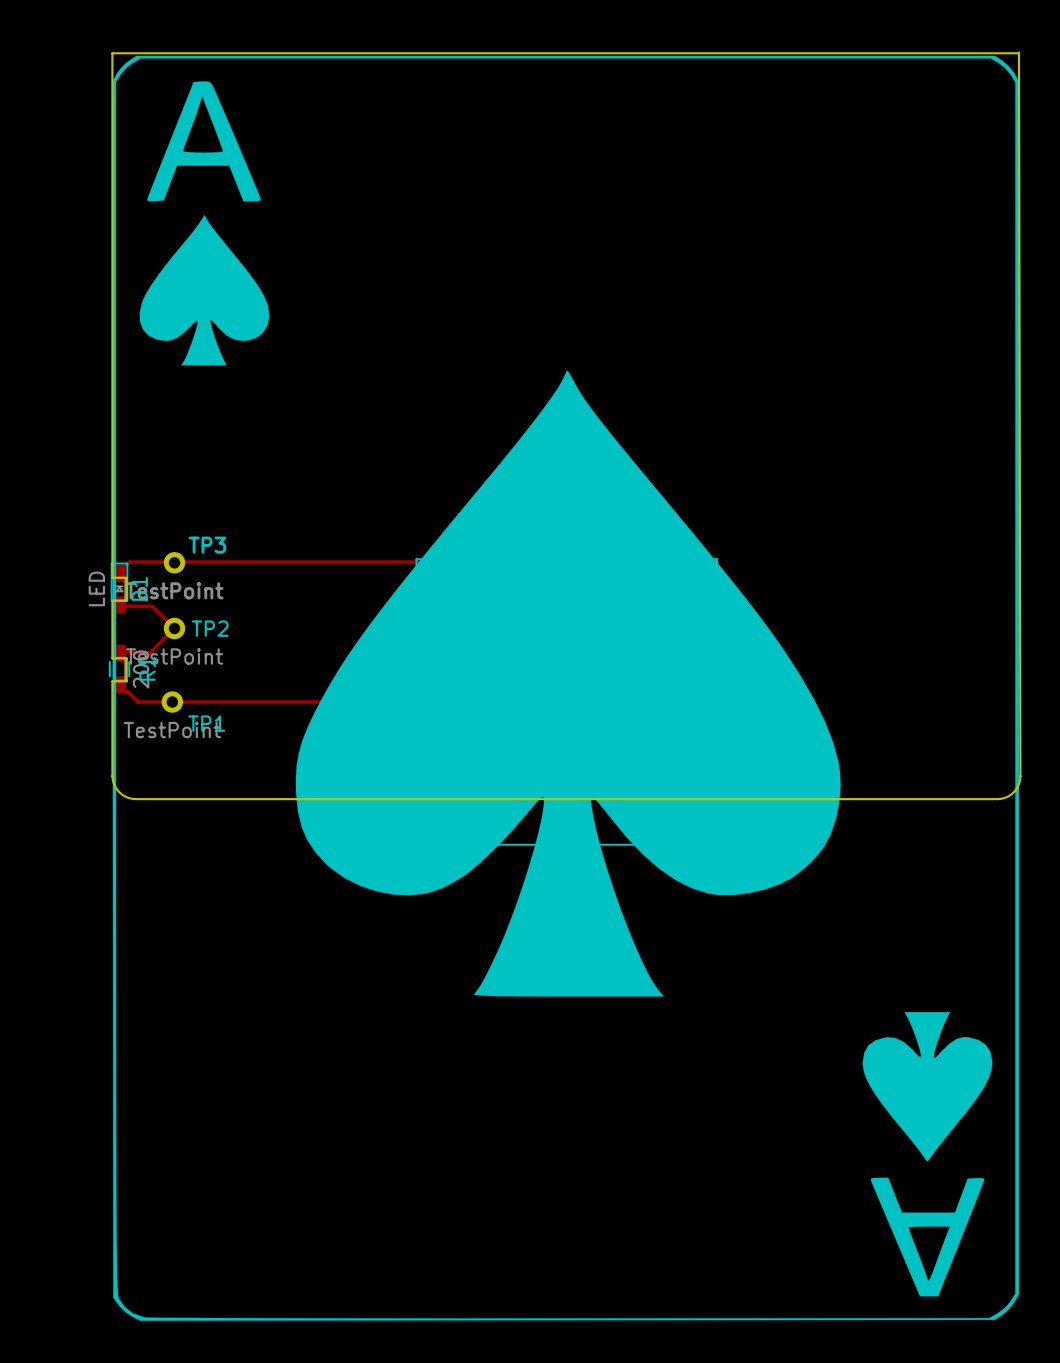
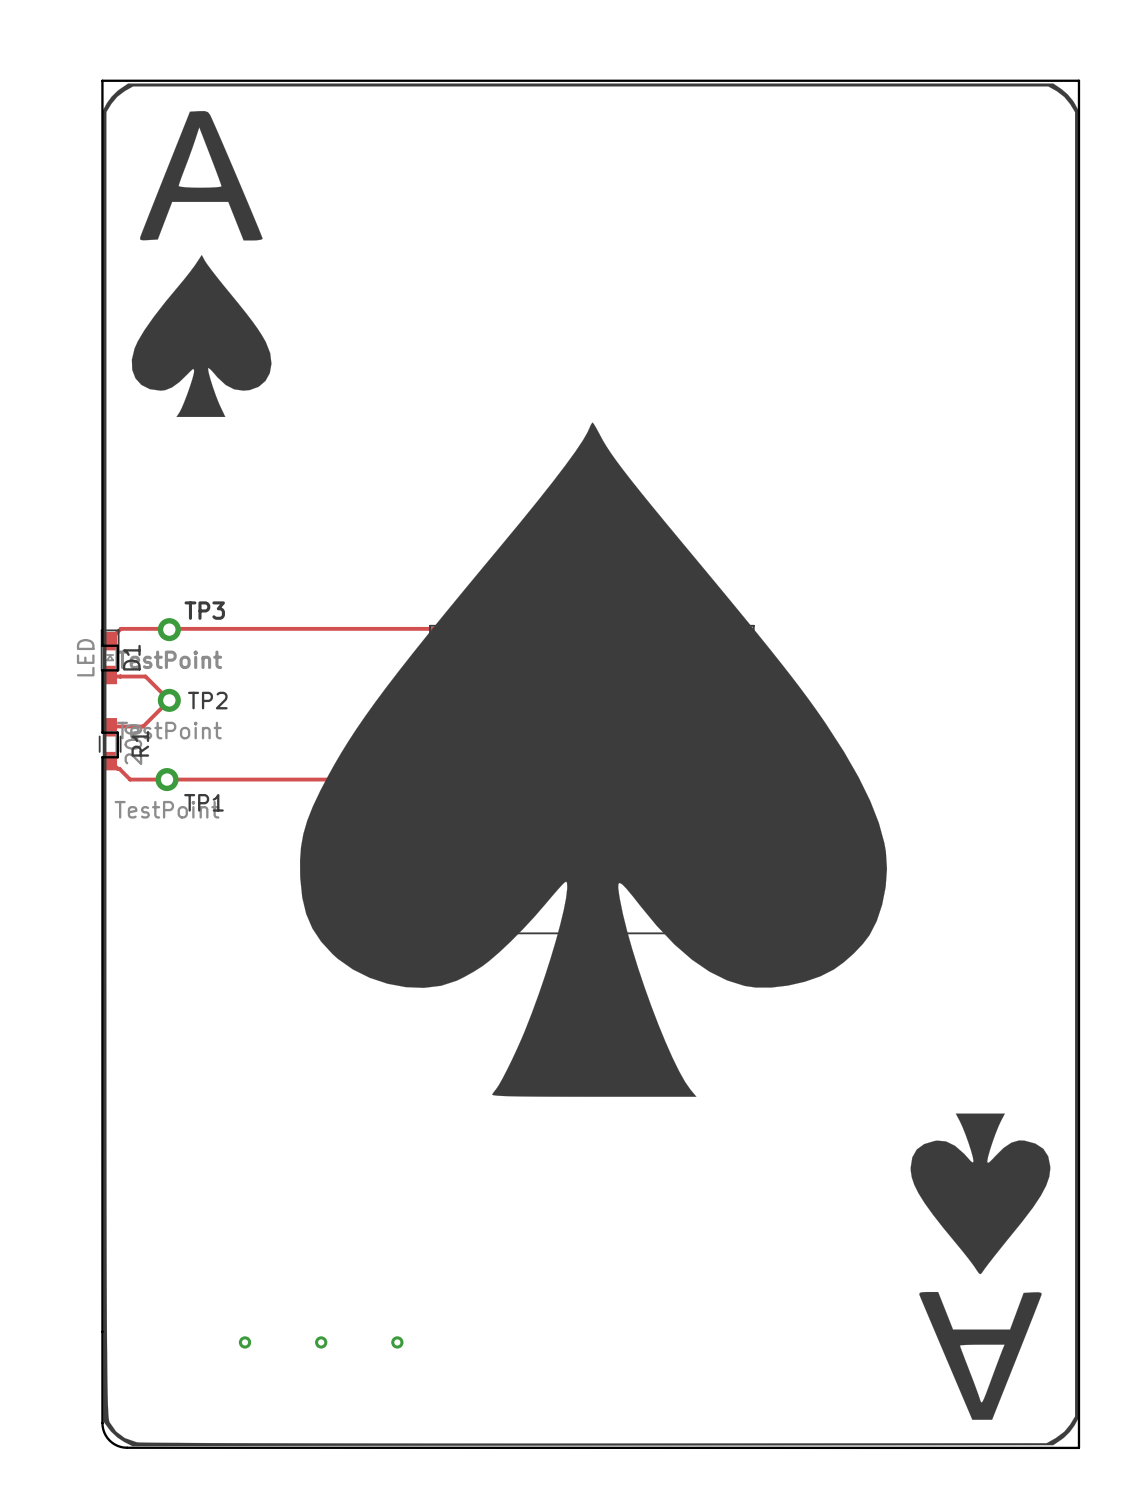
board edge: (1018, 53) (1020, 776) (1018, 785) (1011, 794) (997, 799) (135, 799) (127, 797) (119, 792) (114, 785) (112, 776) -> (1078, 80) (1078, 1447) (127, 1447) (114, 1444) (105, 1435) (102, 1423) (102, 859)
via: none -> (245, 1342)
via: none -> (321, 1342)
via: none -> (397, 1342)

